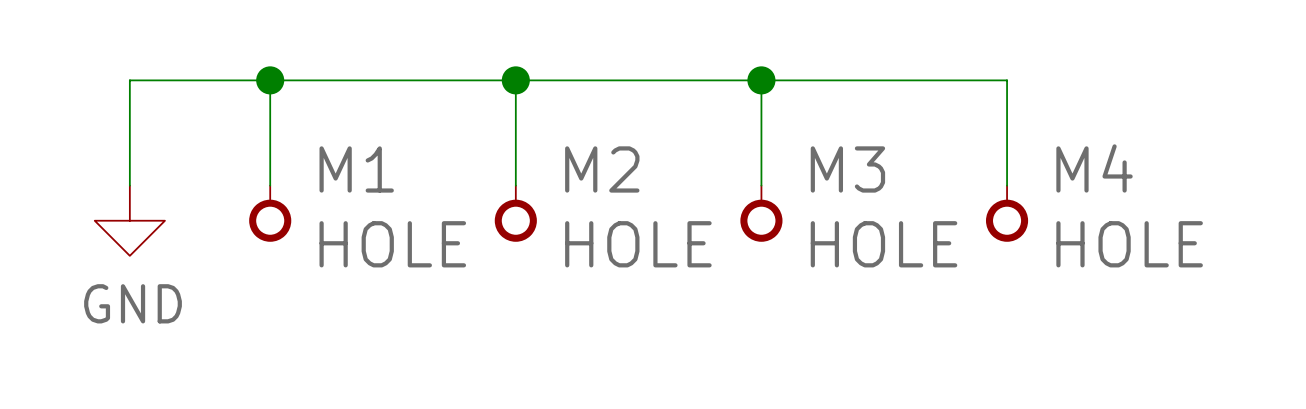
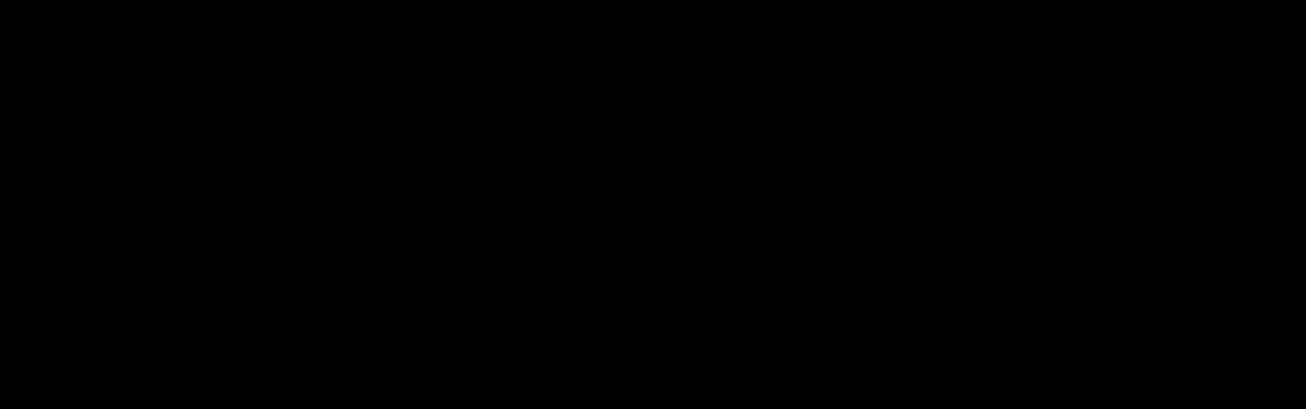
wire: (270, 80) (270, 185) -> none
junction: (270, 80) -> none
wire: (515, 80) (515, 185) -> none
junction: (515, 80) -> none
wire: (761, 80) (761, 185) -> none
junction: (761, 80) -> none
wire: (129, 185) (129, 80) (1007, 80) (1007, 185) -> none
M1: HOLE (270, 213) -> none
M2: HOLE (515, 213) -> none
M3: HOLE (761, 213) -> none
M4: HOLE (1007, 213) -> none
power symbol: GND (129, 220) -> none

